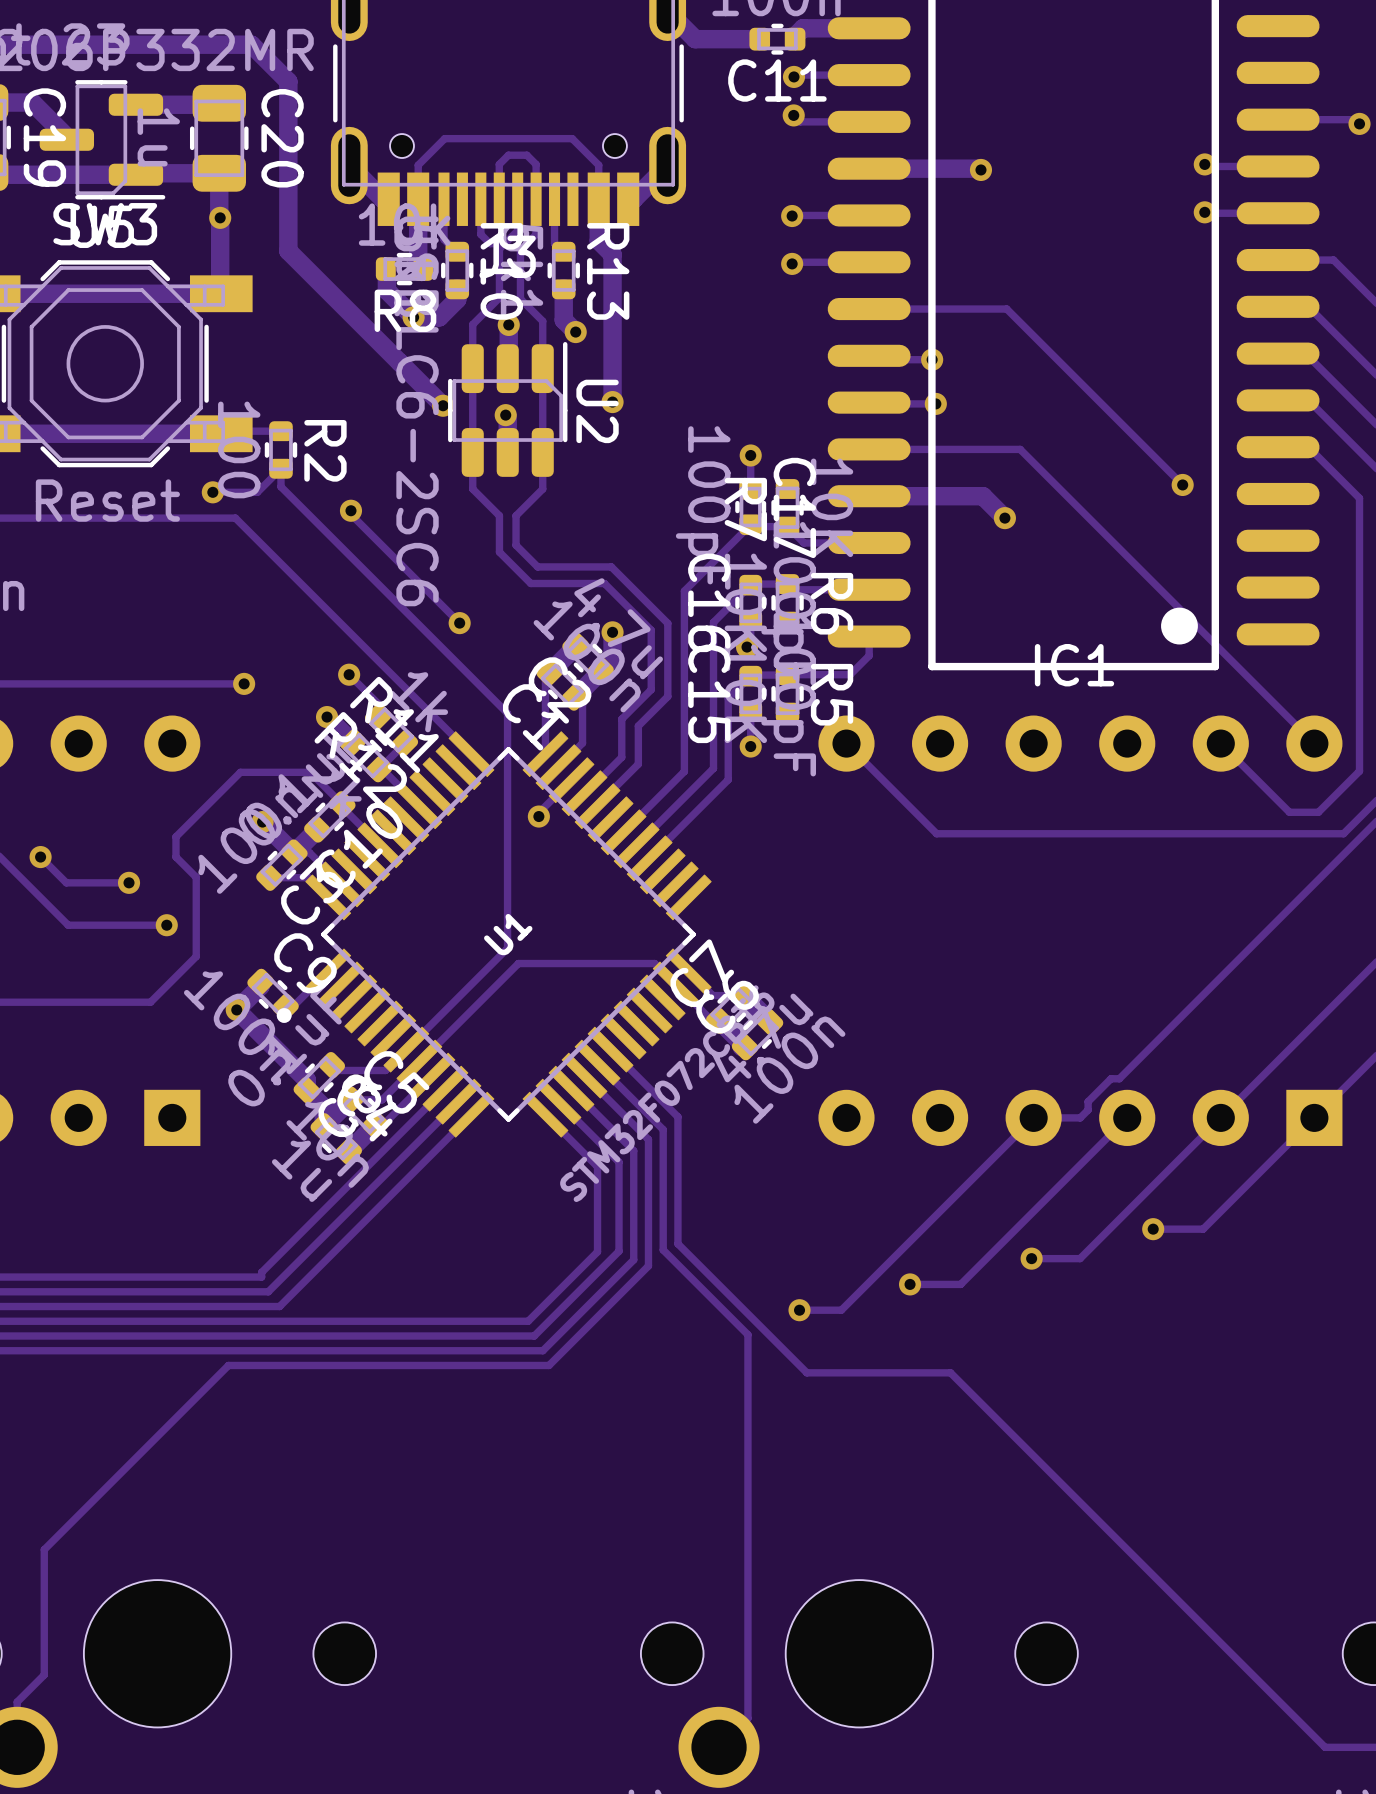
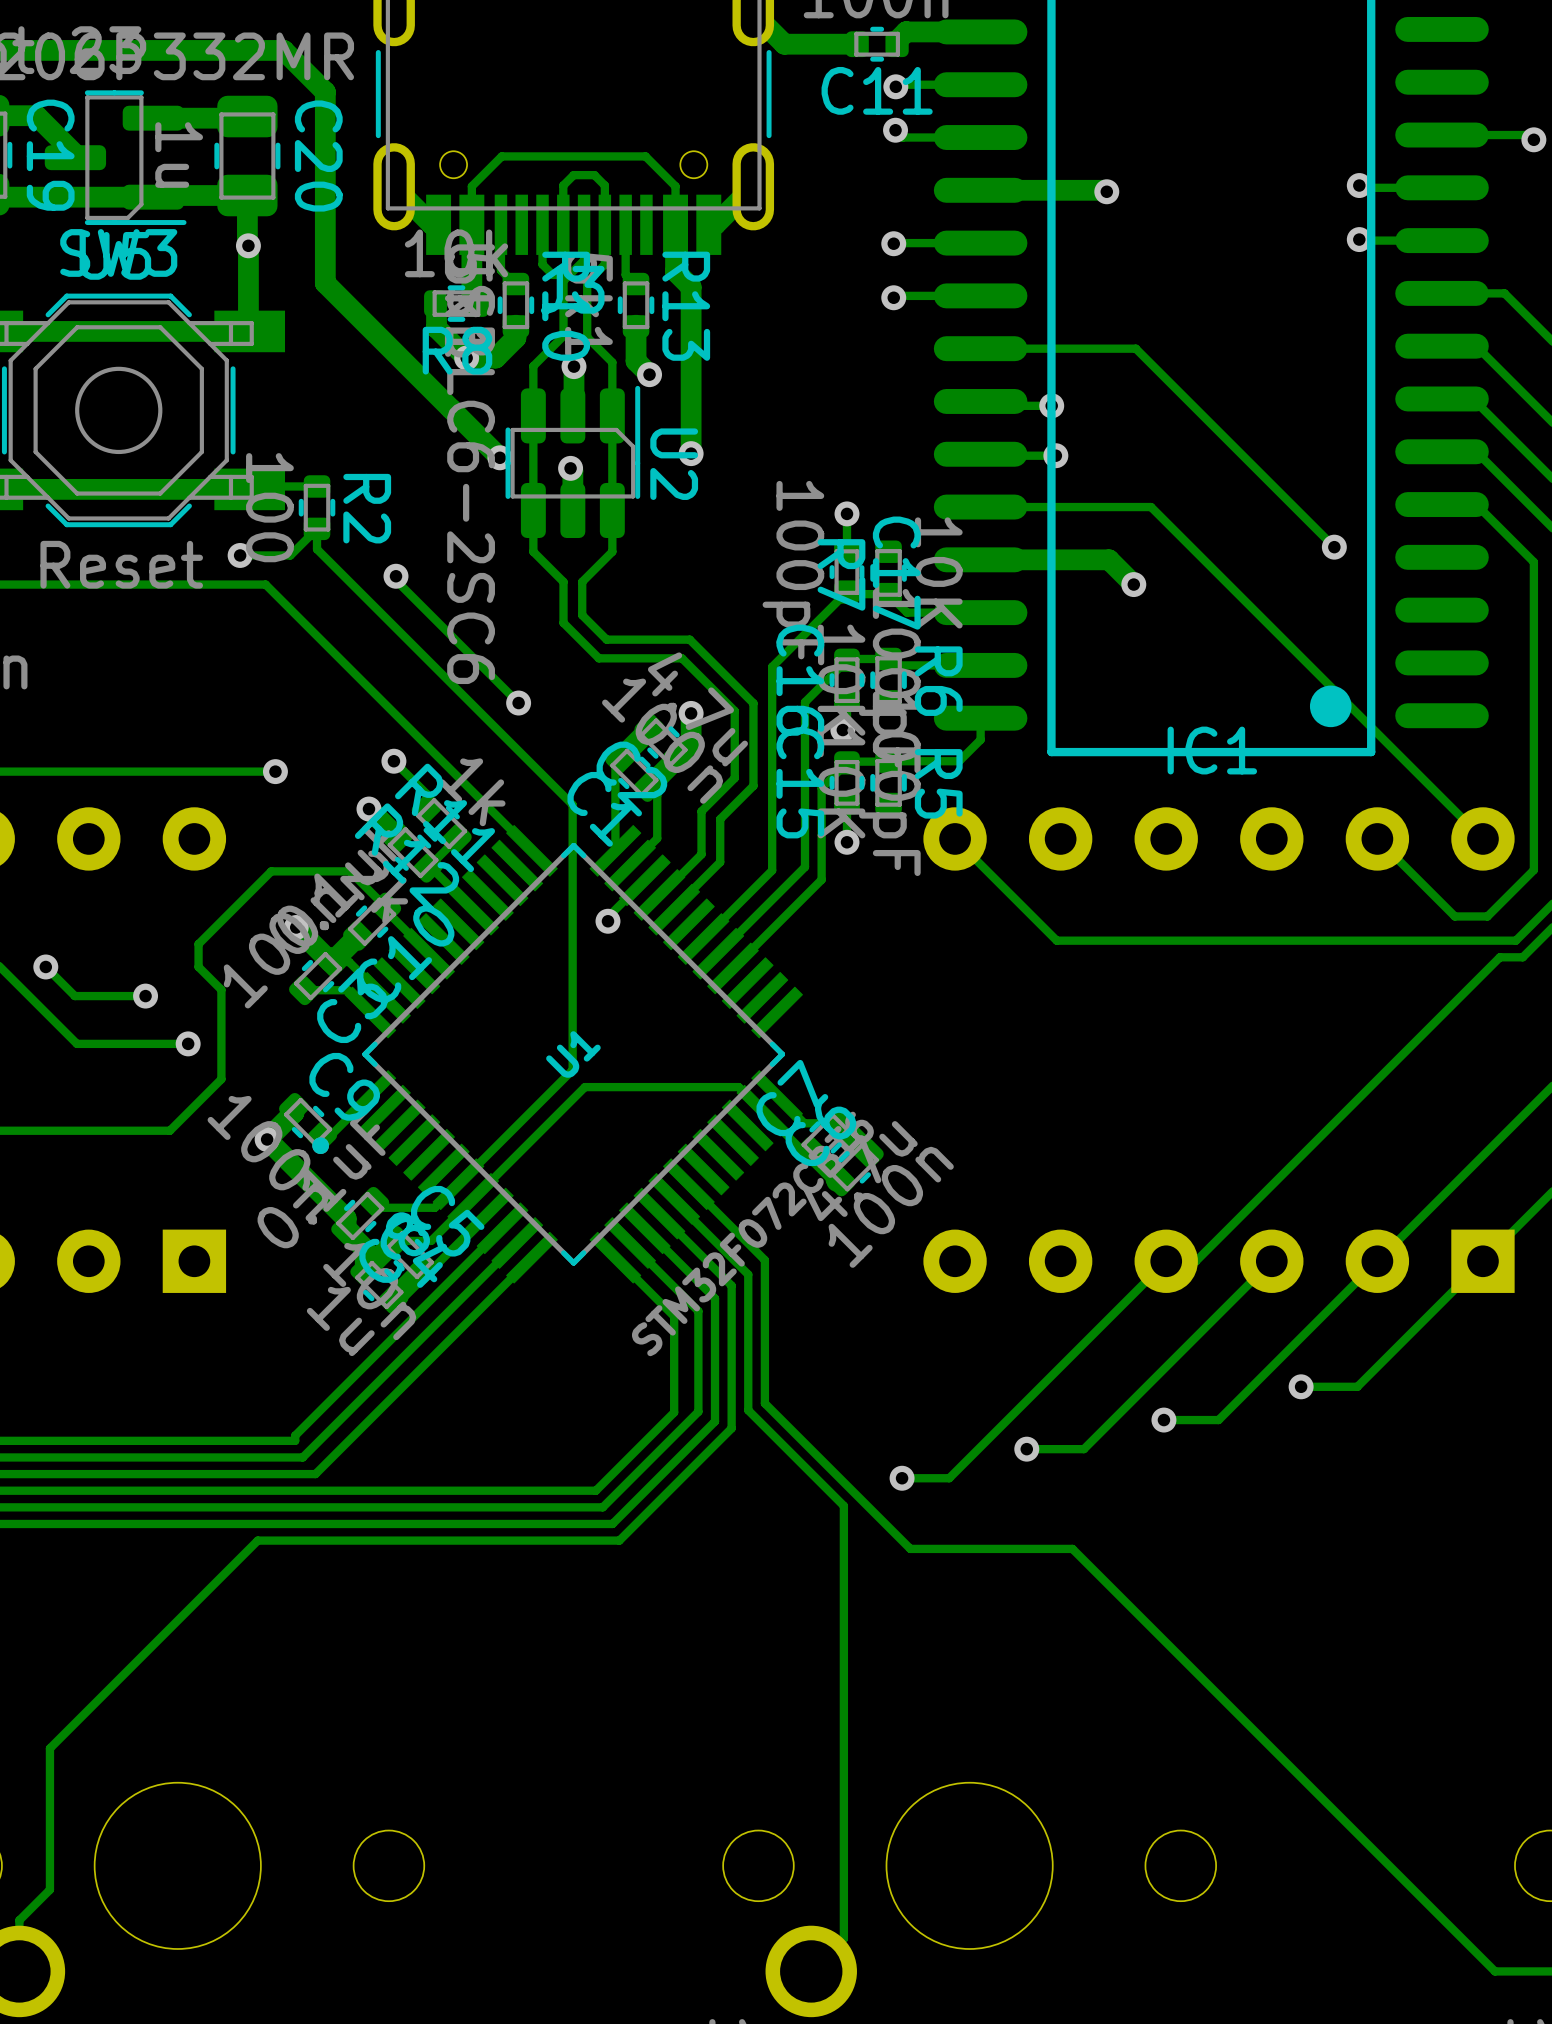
track: (1349, 848) (1119, 1078) (1111, 1078) (1088, 1101) (1088, 1110) (1080, 1117) (1060, 1117) -> (1522, 957) (1499, 957) (1195, 1261)

